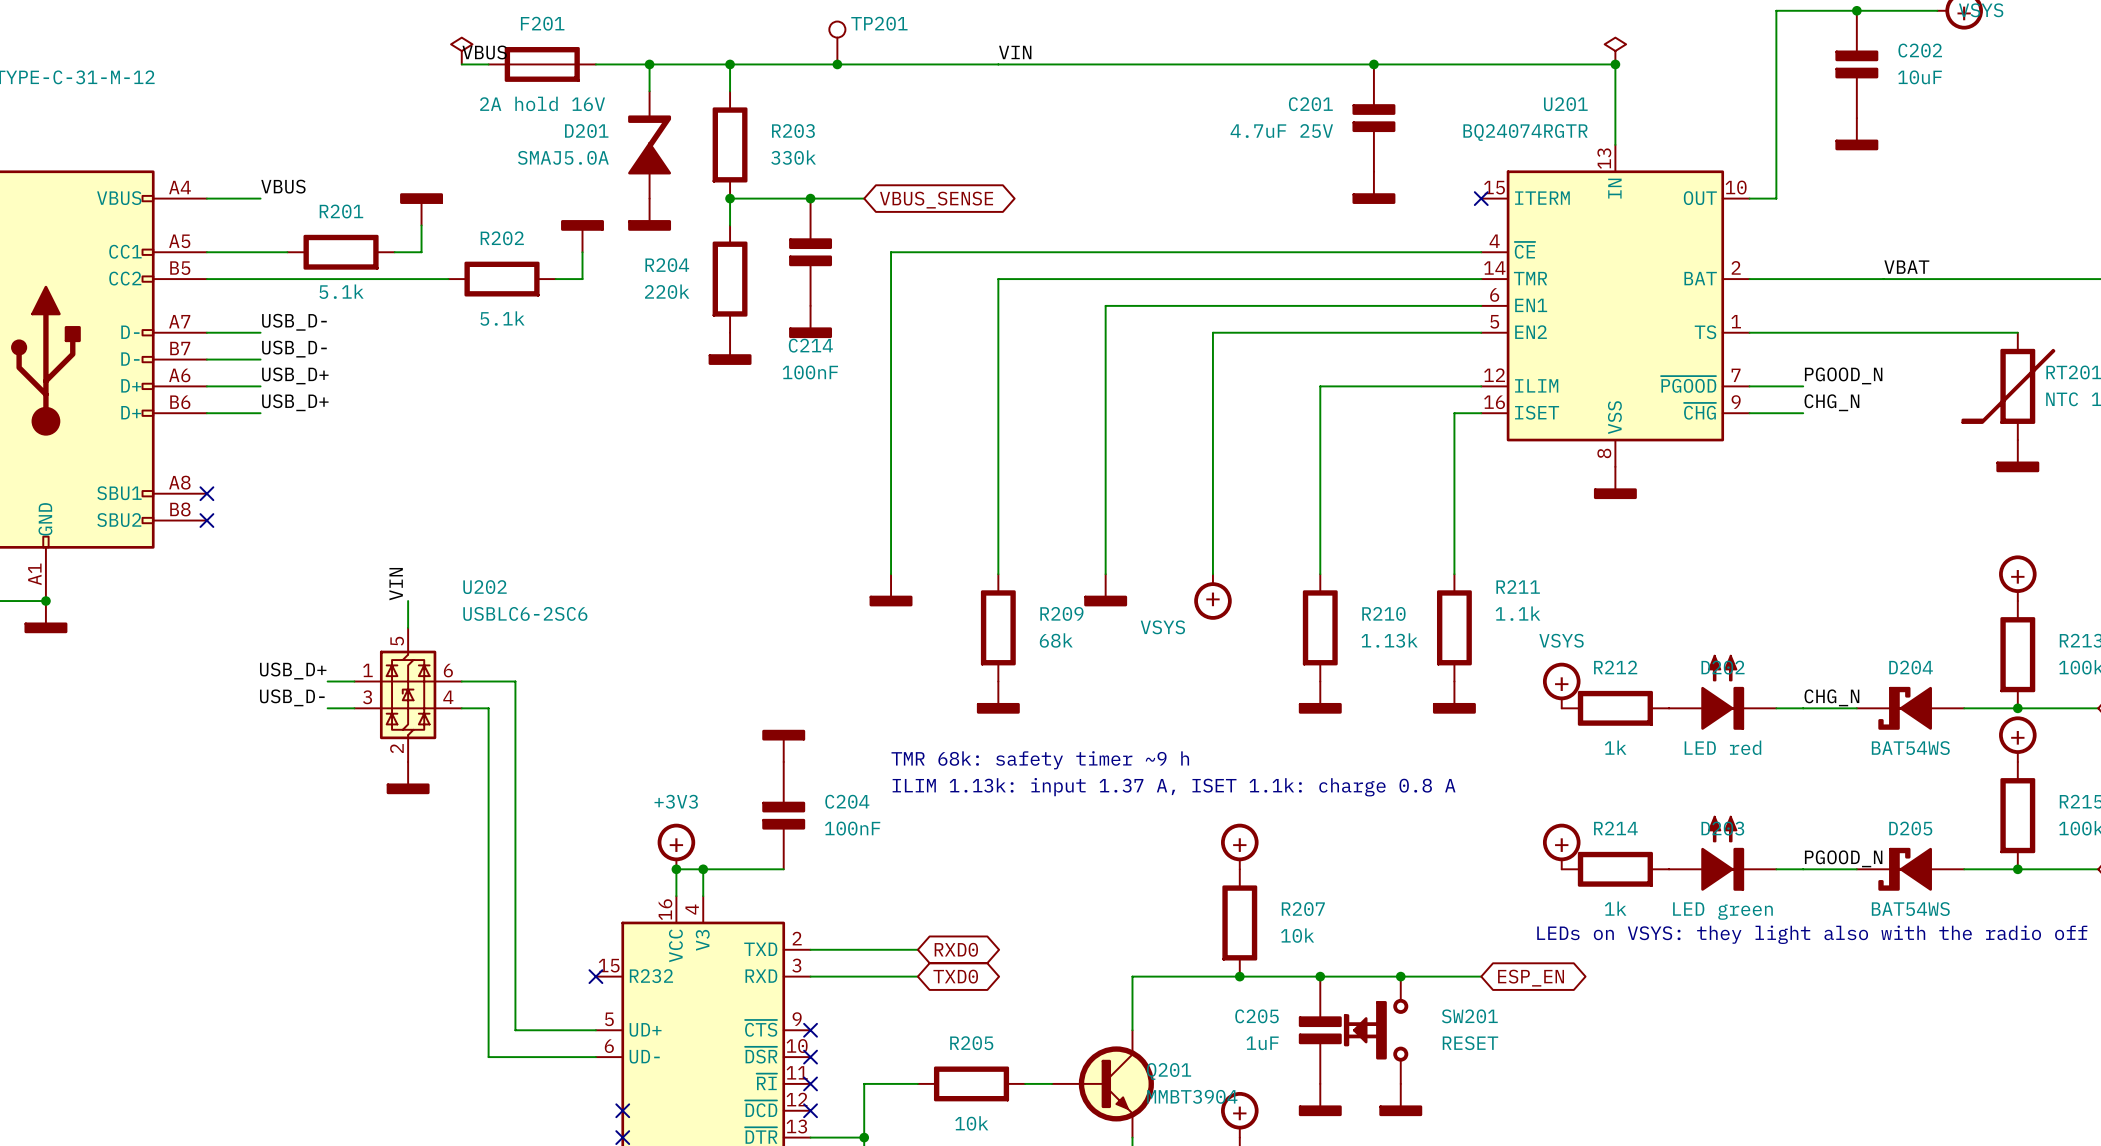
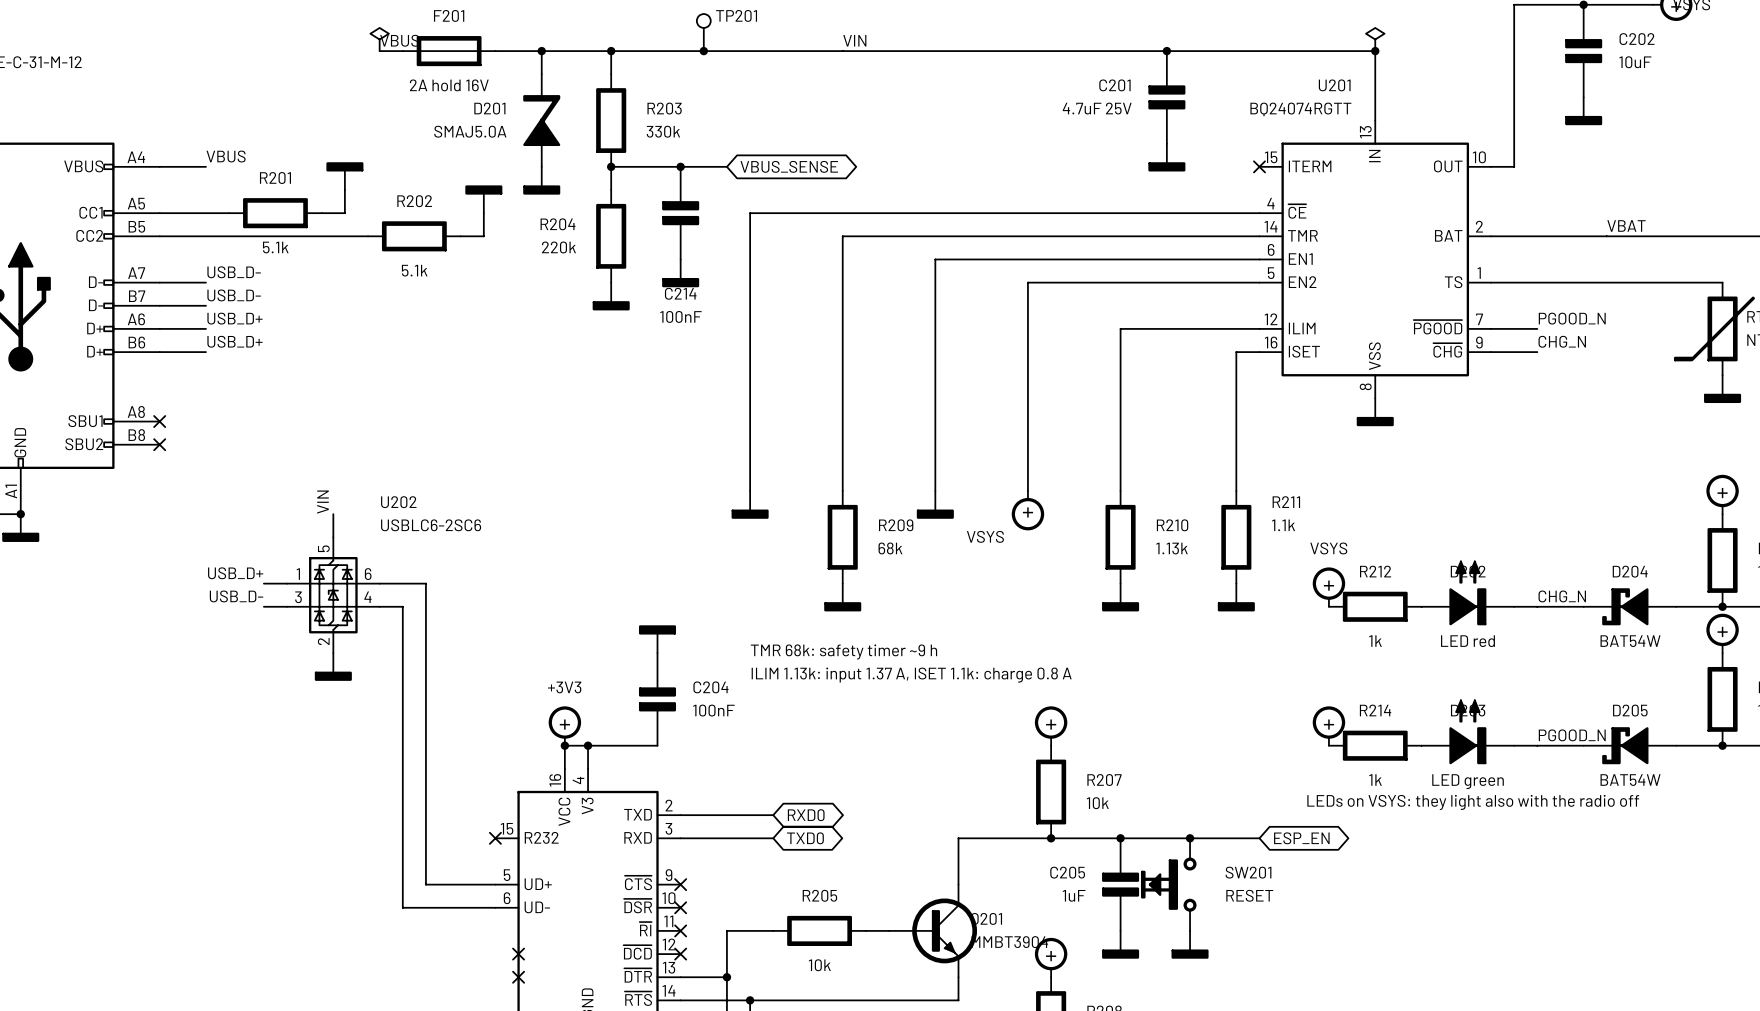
U201 value: BQ24074RGTR (1525, 132) -> BQ24074RGTT (1300, 109)
D204 value: BAT54WS (1910, 748) -> BAT54W (1630, 641)
D205 value: BAT54WS (1910, 909) -> BAT54W (1630, 780)

